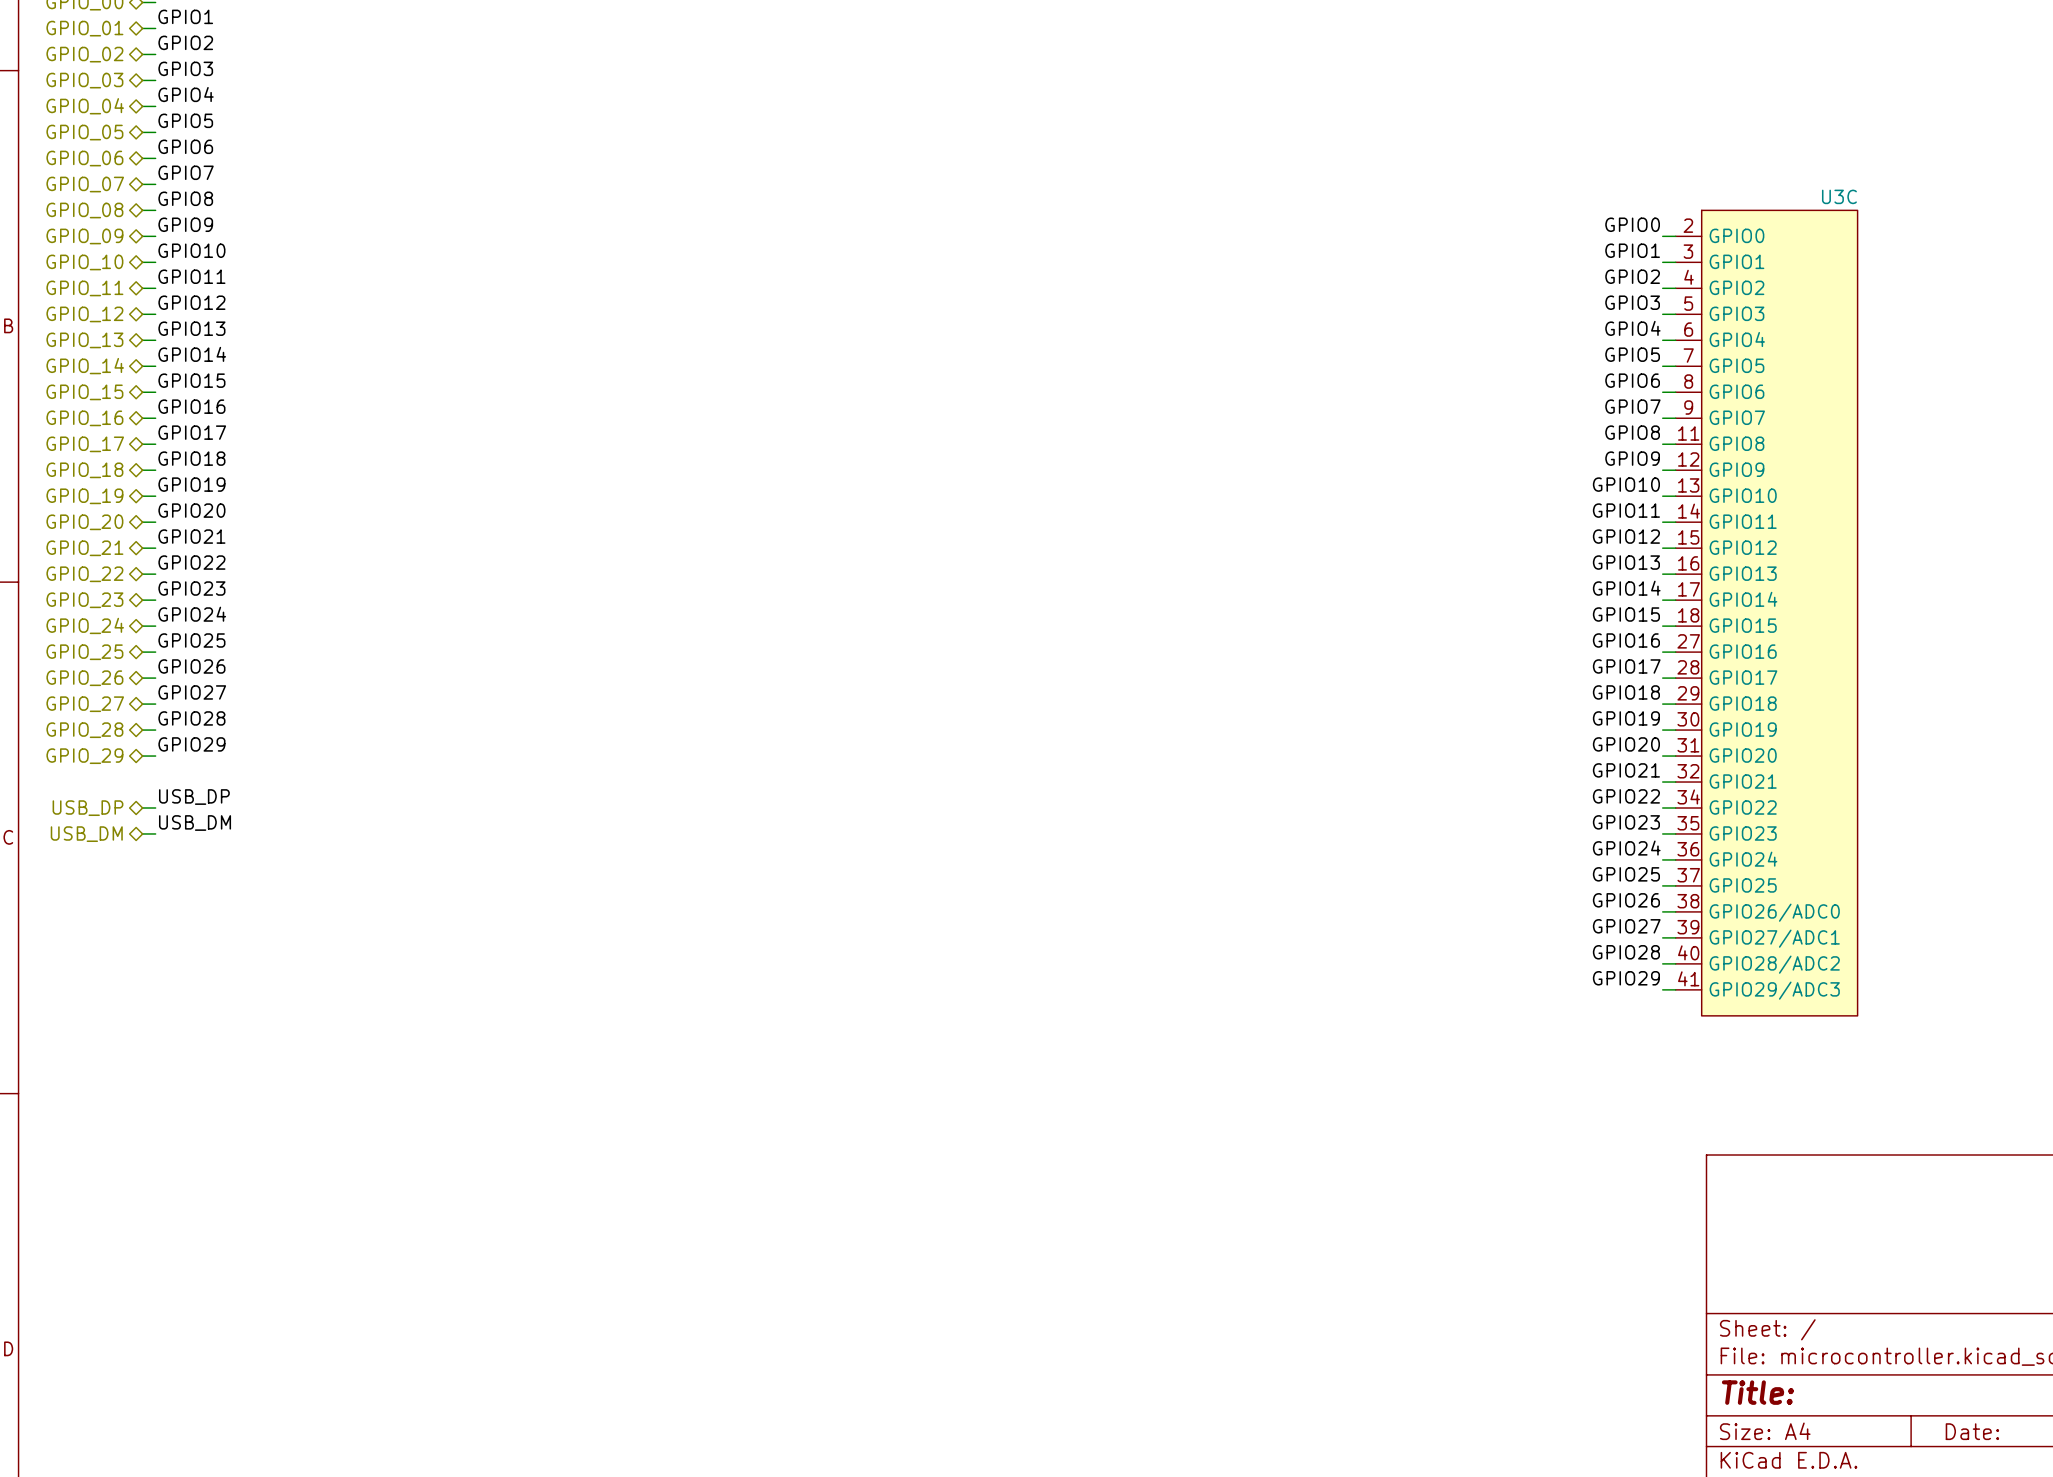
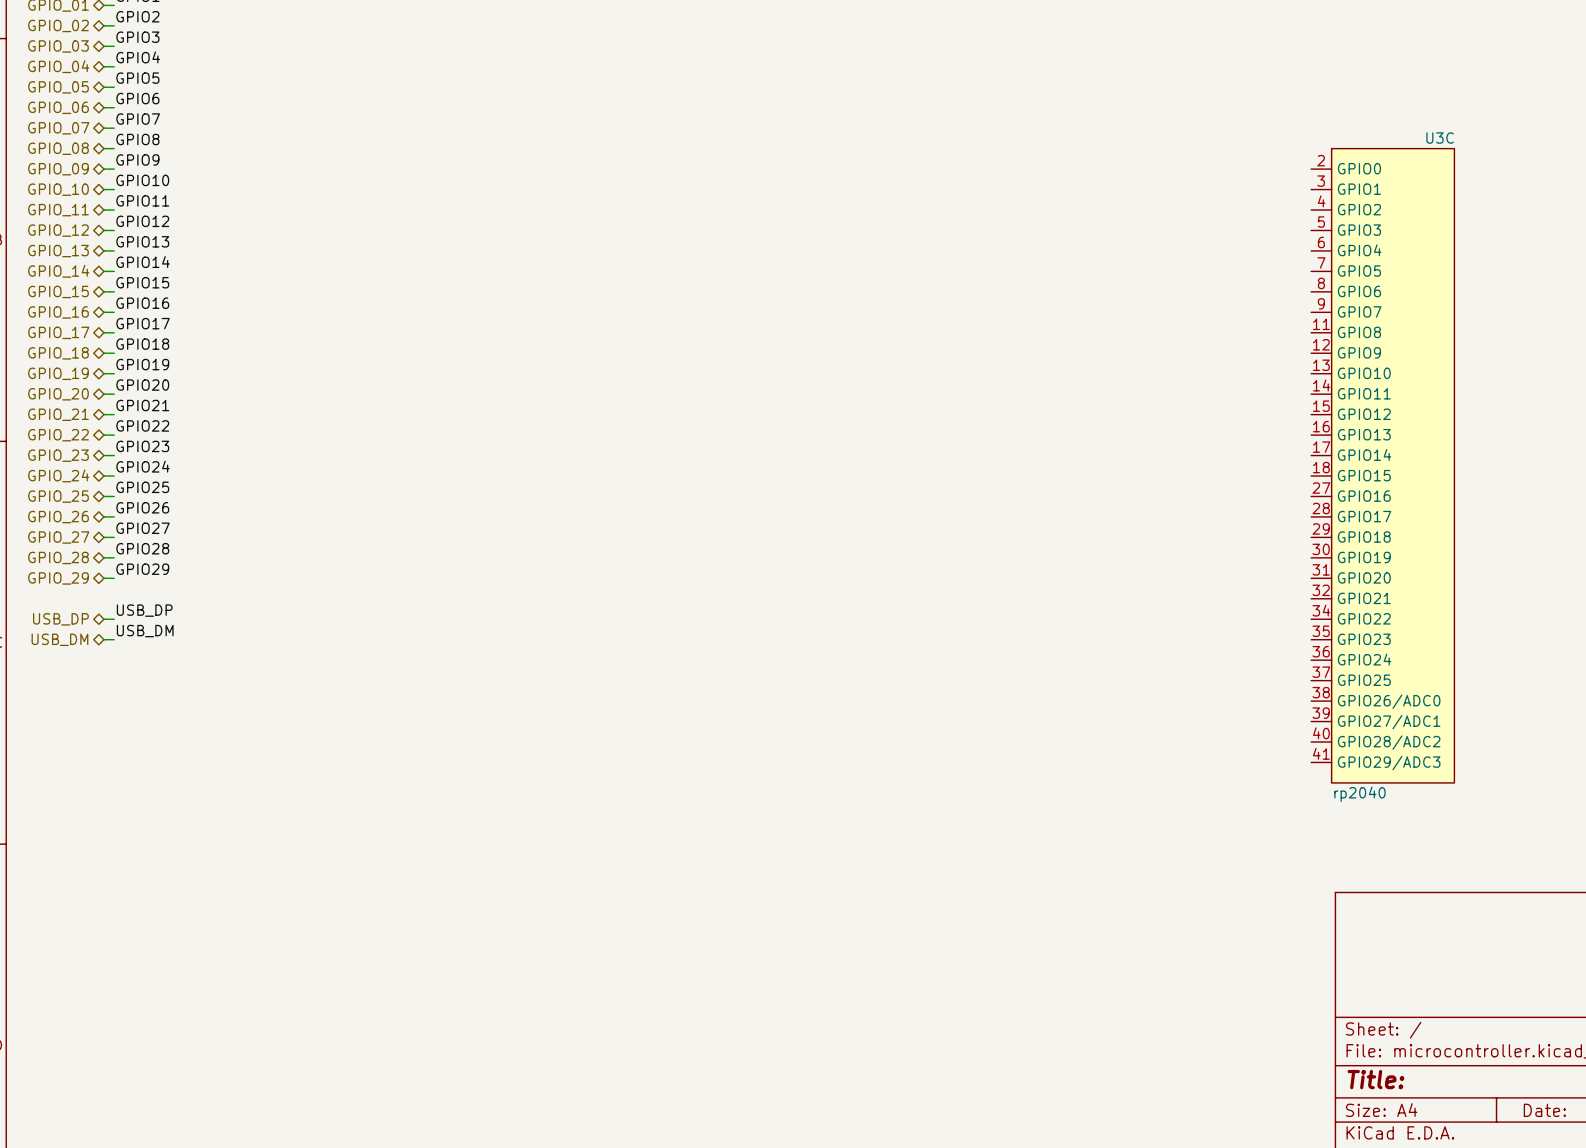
label: GPIO0 (1632, 224) -> none
wire: (1662, 236) (1675, 236) -> none
label: GPIO1 (1632, 250) -> none
wire: (1662, 262) (1675, 262) -> none
label: GPIO2 (1632, 276) -> none
wire: (1662, 288) (1675, 288) -> none
label: GPIO3 (1632, 302) -> none
wire: (1662, 314) (1675, 314) -> none
label: GPIO4 (1632, 328) -> none
wire: (1662, 340) (1675, 340) -> none
label: GPIO5 (1632, 354) -> none
wire: (1662, 366) (1675, 366) -> none
label: GPIO6 (1632, 380) -> none
wire: (1662, 392) (1675, 392) -> none
label: GPIO7 (1632, 406) -> none
wire: (1662, 418) (1675, 418) -> none
label: GPIO8 (1632, 432) -> none
wire: (1662, 444) (1675, 444) -> none
label: GPIO9 (1632, 458) -> none
wire: (1662, 470) (1675, 470) -> none
label: GPIO10 (1626, 484) -> none
wire: (1662, 496) (1675, 496) -> none
label: GPIO11 (1626, 510) -> none
wire: (1662, 522) (1675, 522) -> none
label: GPIO12 (1626, 536) -> none
wire: (1662, 548) (1675, 548) -> none
label: GPIO13 (1626, 562) -> none
wire: (1662, 574) (1675, 574) -> none
label: GPIO14 (1626, 588) -> none
wire: (1662, 600) (1675, 600) -> none
label: GPIO15 (1626, 614) -> none
wire: (1662, 626) (1675, 626) -> none
label: GPIO16 (1626, 640) -> none
wire: (1662, 652) (1675, 652) -> none
label: GPIO17 (1626, 666) -> none
wire: (1662, 678) (1675, 678) -> none
label: GPIO18 (1626, 692) -> none
wire: (1662, 704) (1675, 704) -> none
label: GPIO19 (1626, 718) -> none
wire: (1662, 730) (1675, 730) -> none
label: GPIO20 (1626, 744) -> none
wire: (1662, 756) (1675, 756) -> none
label: GPIO21 (1626, 770) -> none
wire: (1662, 782) (1675, 782) -> none
label: GPIO22 (1626, 796) -> none
wire: (1662, 808) (1675, 808) -> none
label: GPIO23 (1626, 822) -> none
wire: (1662, 833) (1675, 833) -> none
label: GPIO24 (1626, 848) -> none
wire: (1662, 859) (1675, 859) -> none
label: GPIO25 (1626, 874) -> none
wire: (1662, 885) (1675, 885) -> none
label: GPIO26 (1626, 900) -> none
wire: (1662, 911) (1675, 911) -> none
label: GPIO27 (1626, 926) -> none
wire: (1662, 937) (1675, 937) -> none
label: GPIO28 (1626, 952) -> none
wire: (1662, 963) (1675, 963) -> none
label: GPIO29 (1626, 978) -> none
wire: (1662, 989) (1675, 989) -> none
U3C value: none -> rp2040 (1359, 794)

